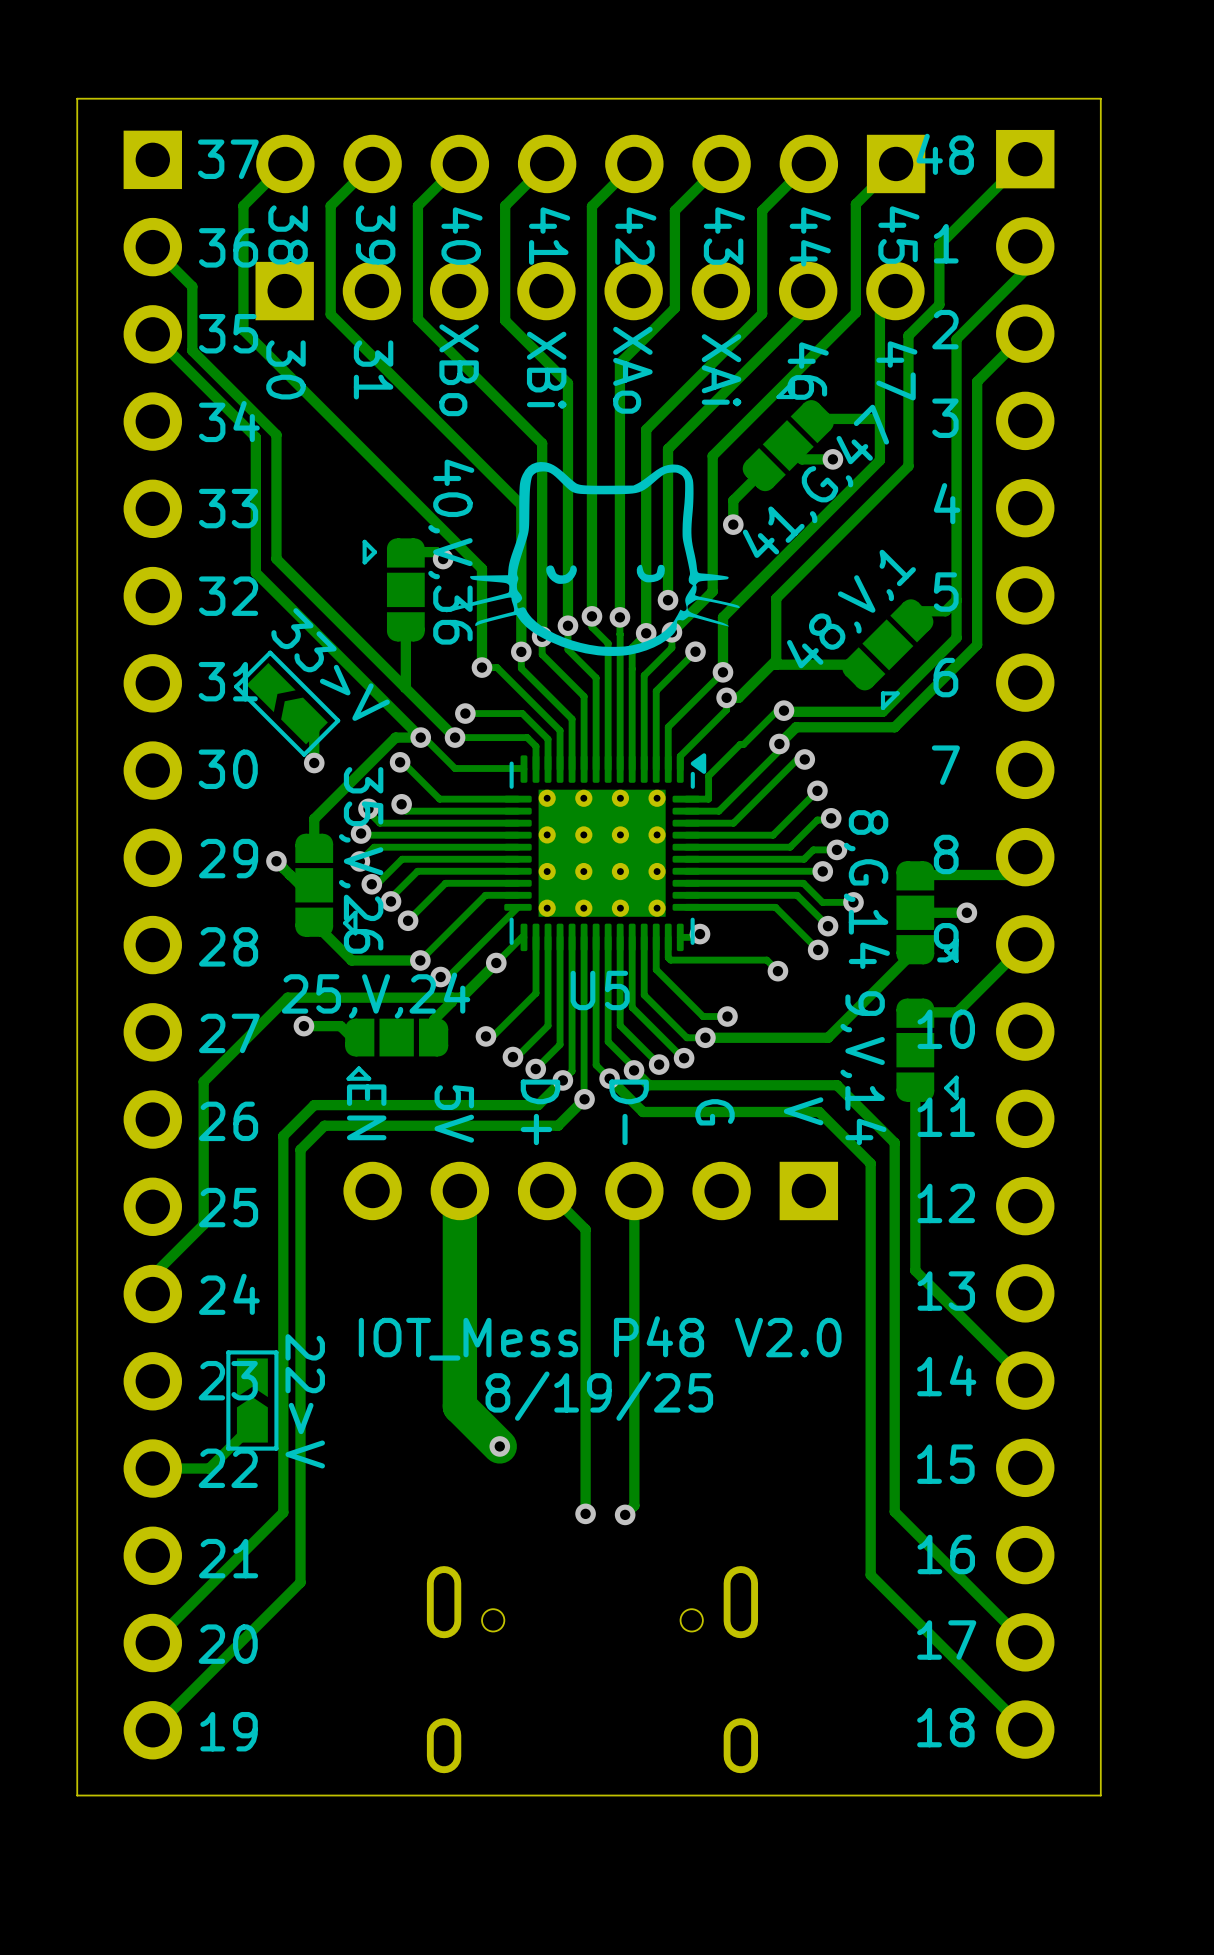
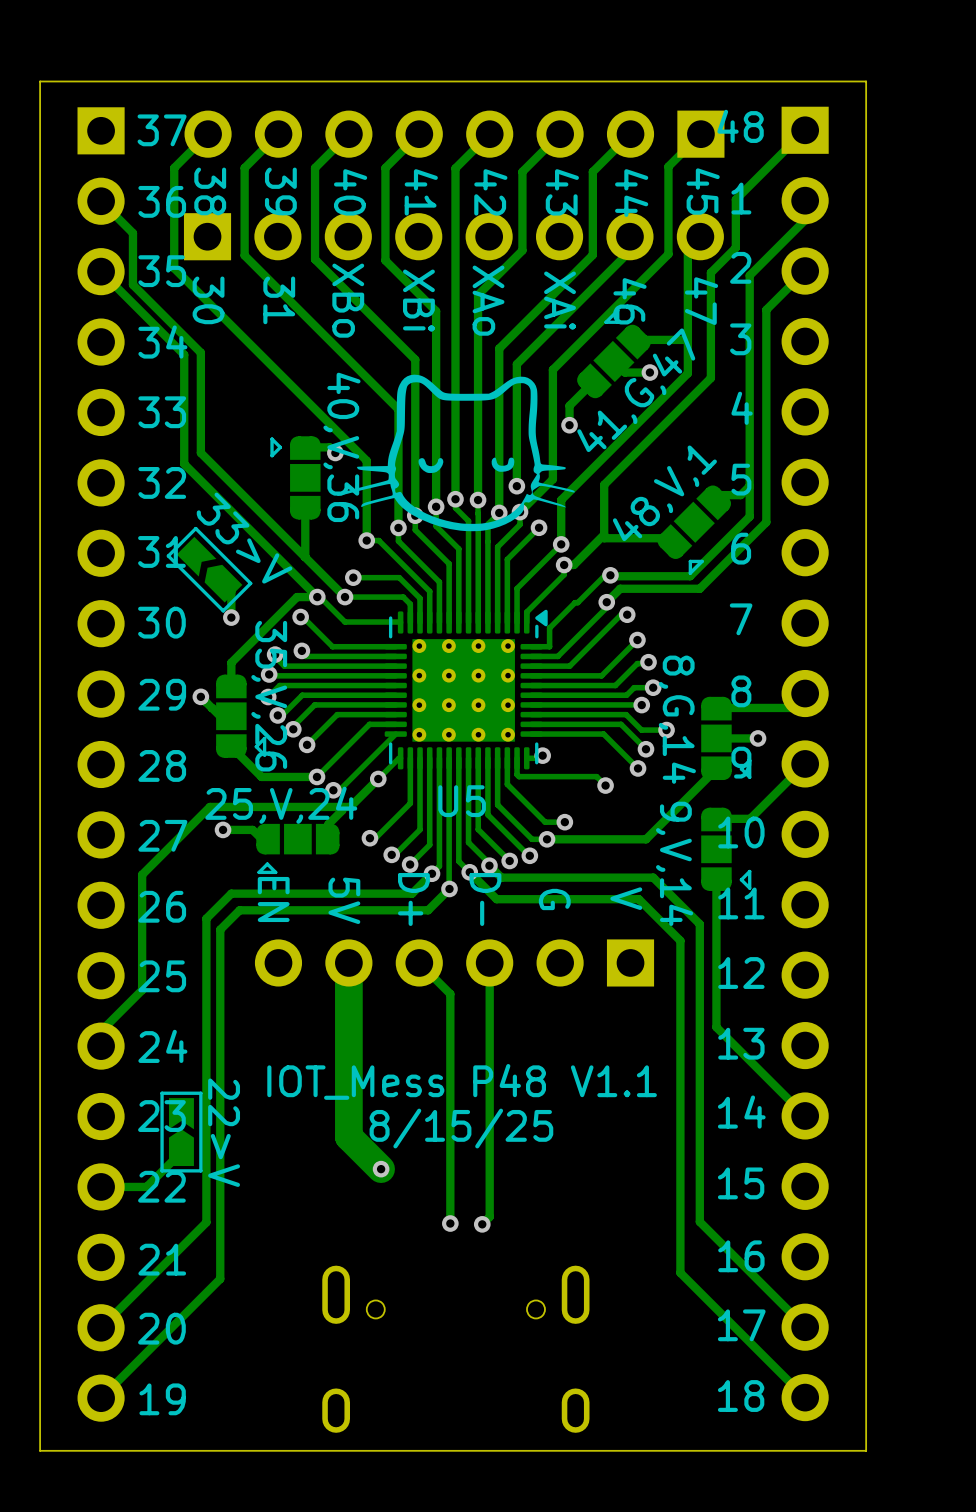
text: IOT_Mess P48 V2.0 (600, 1338) -> IOT_Mess P48 V1.1 (462, 1081)
text: 8/19/25 (599, 1396) -> 8/15/25 (461, 1128)

